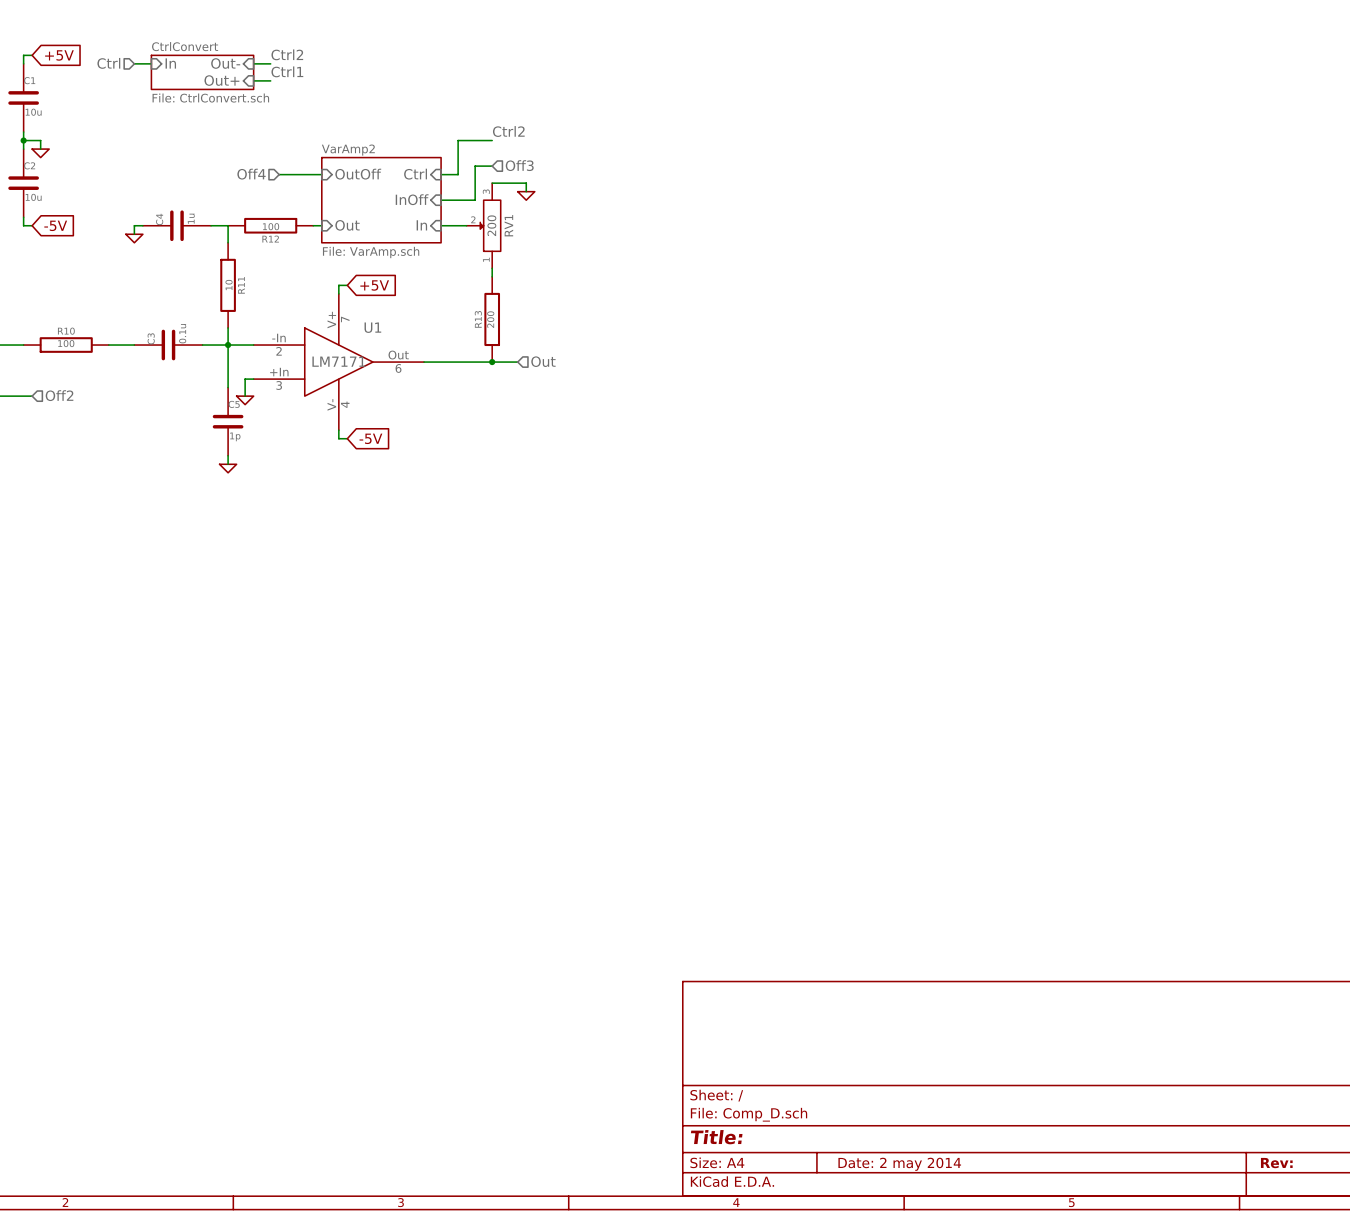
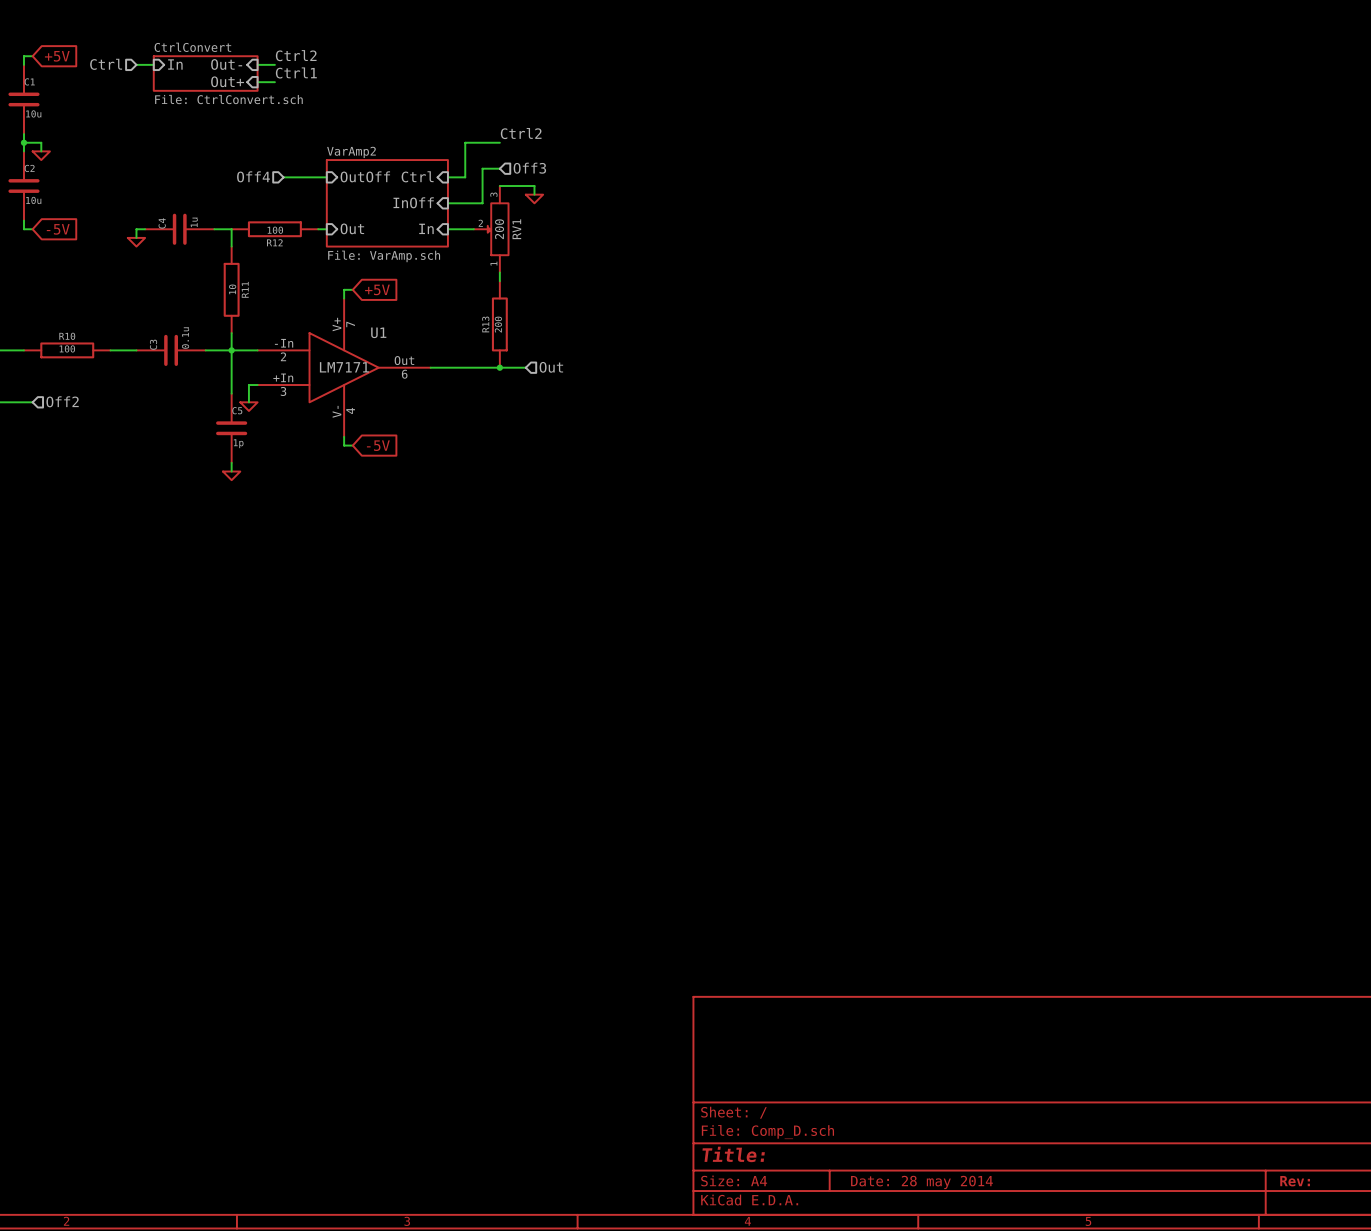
title block: Date: 2 may 2014 (899, 1164) -> Date: 28 may 2014 (921, 1182)

